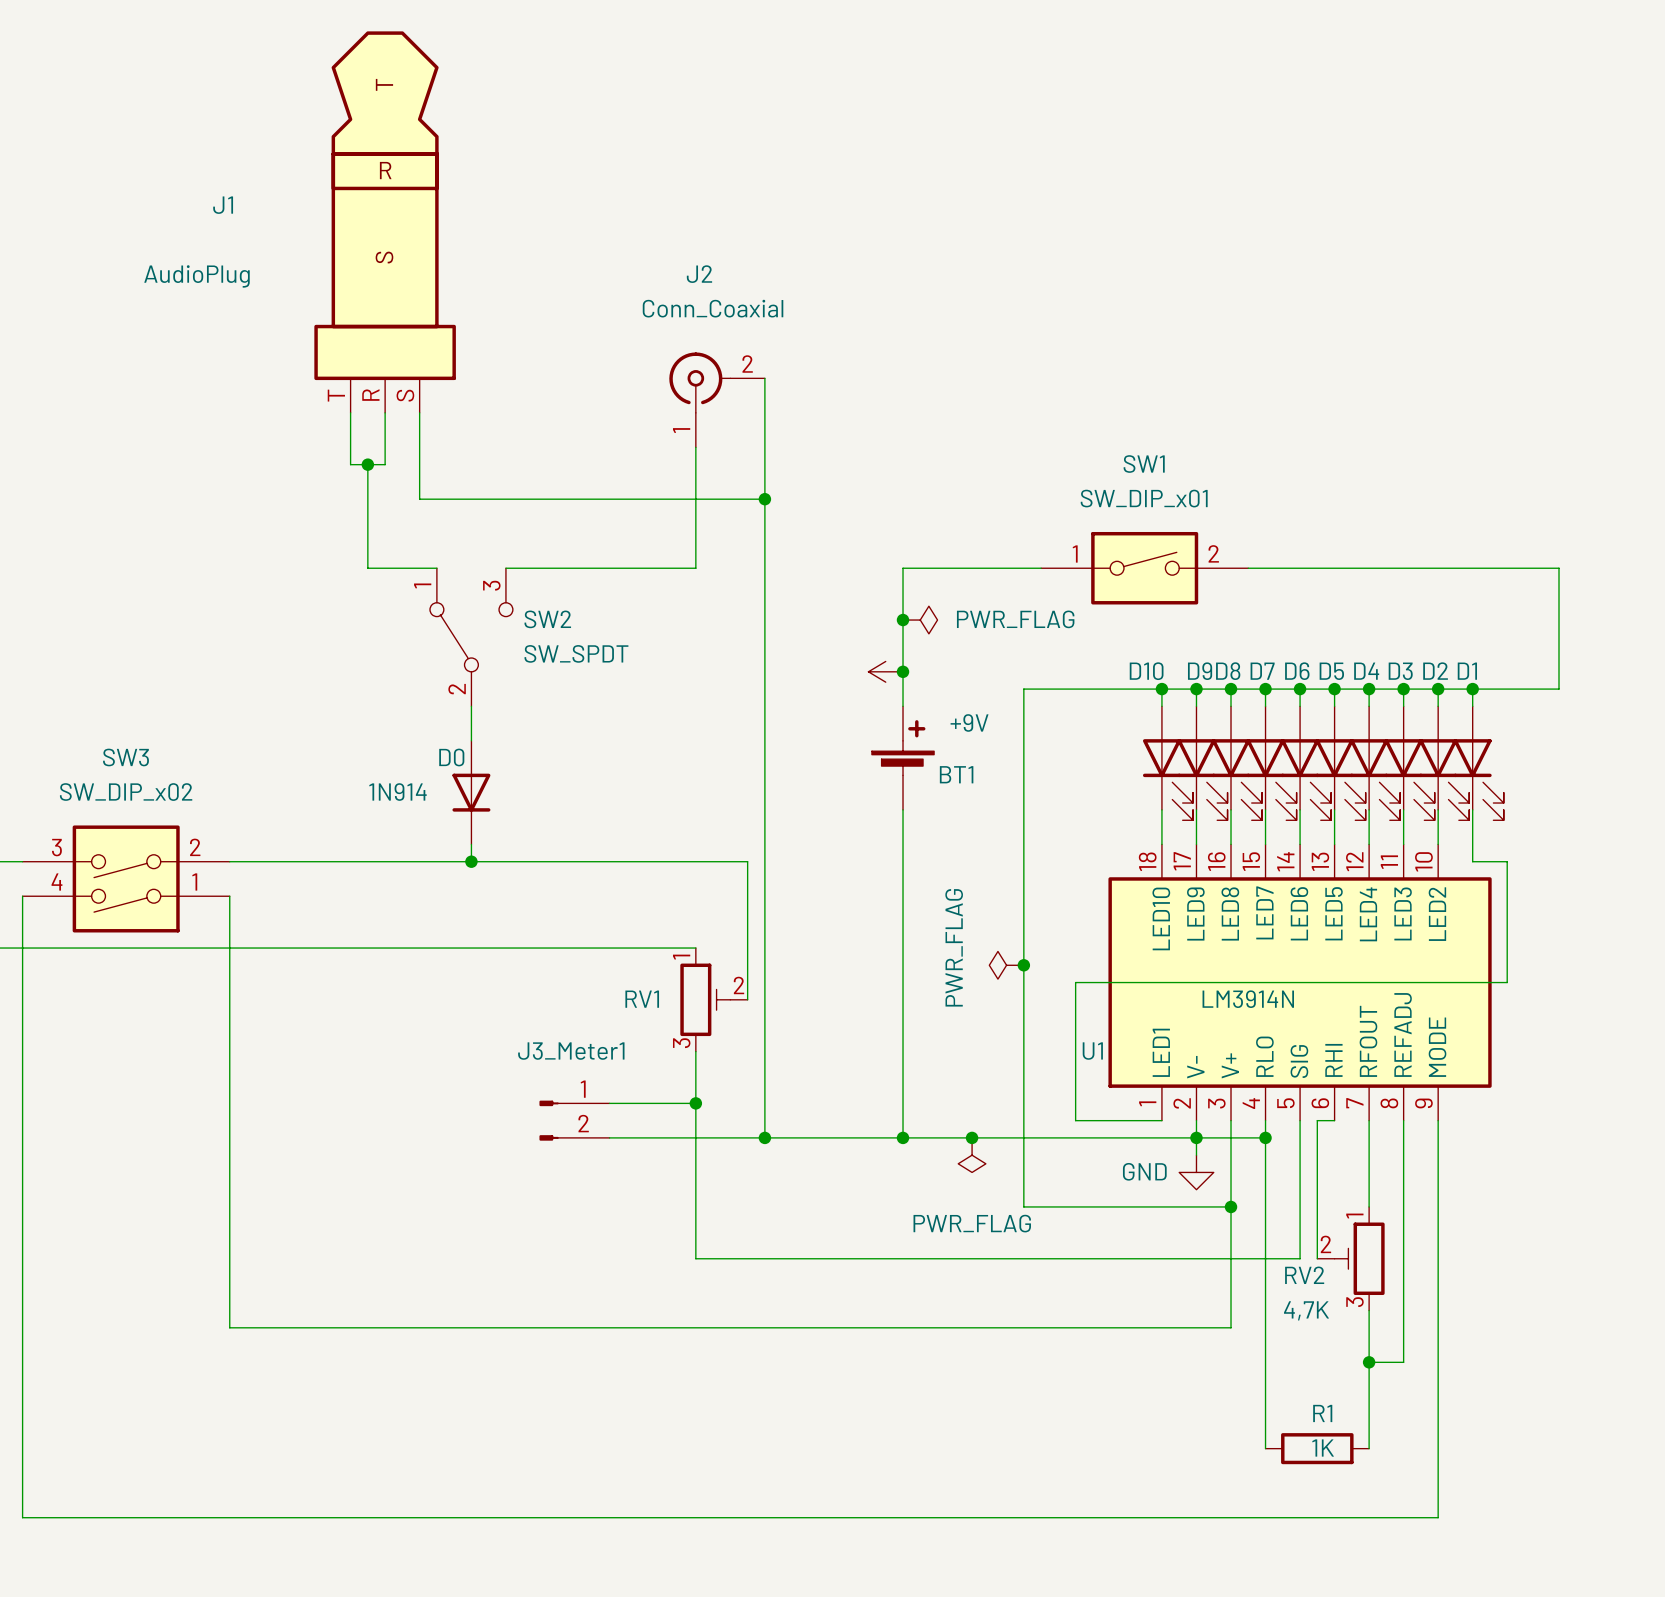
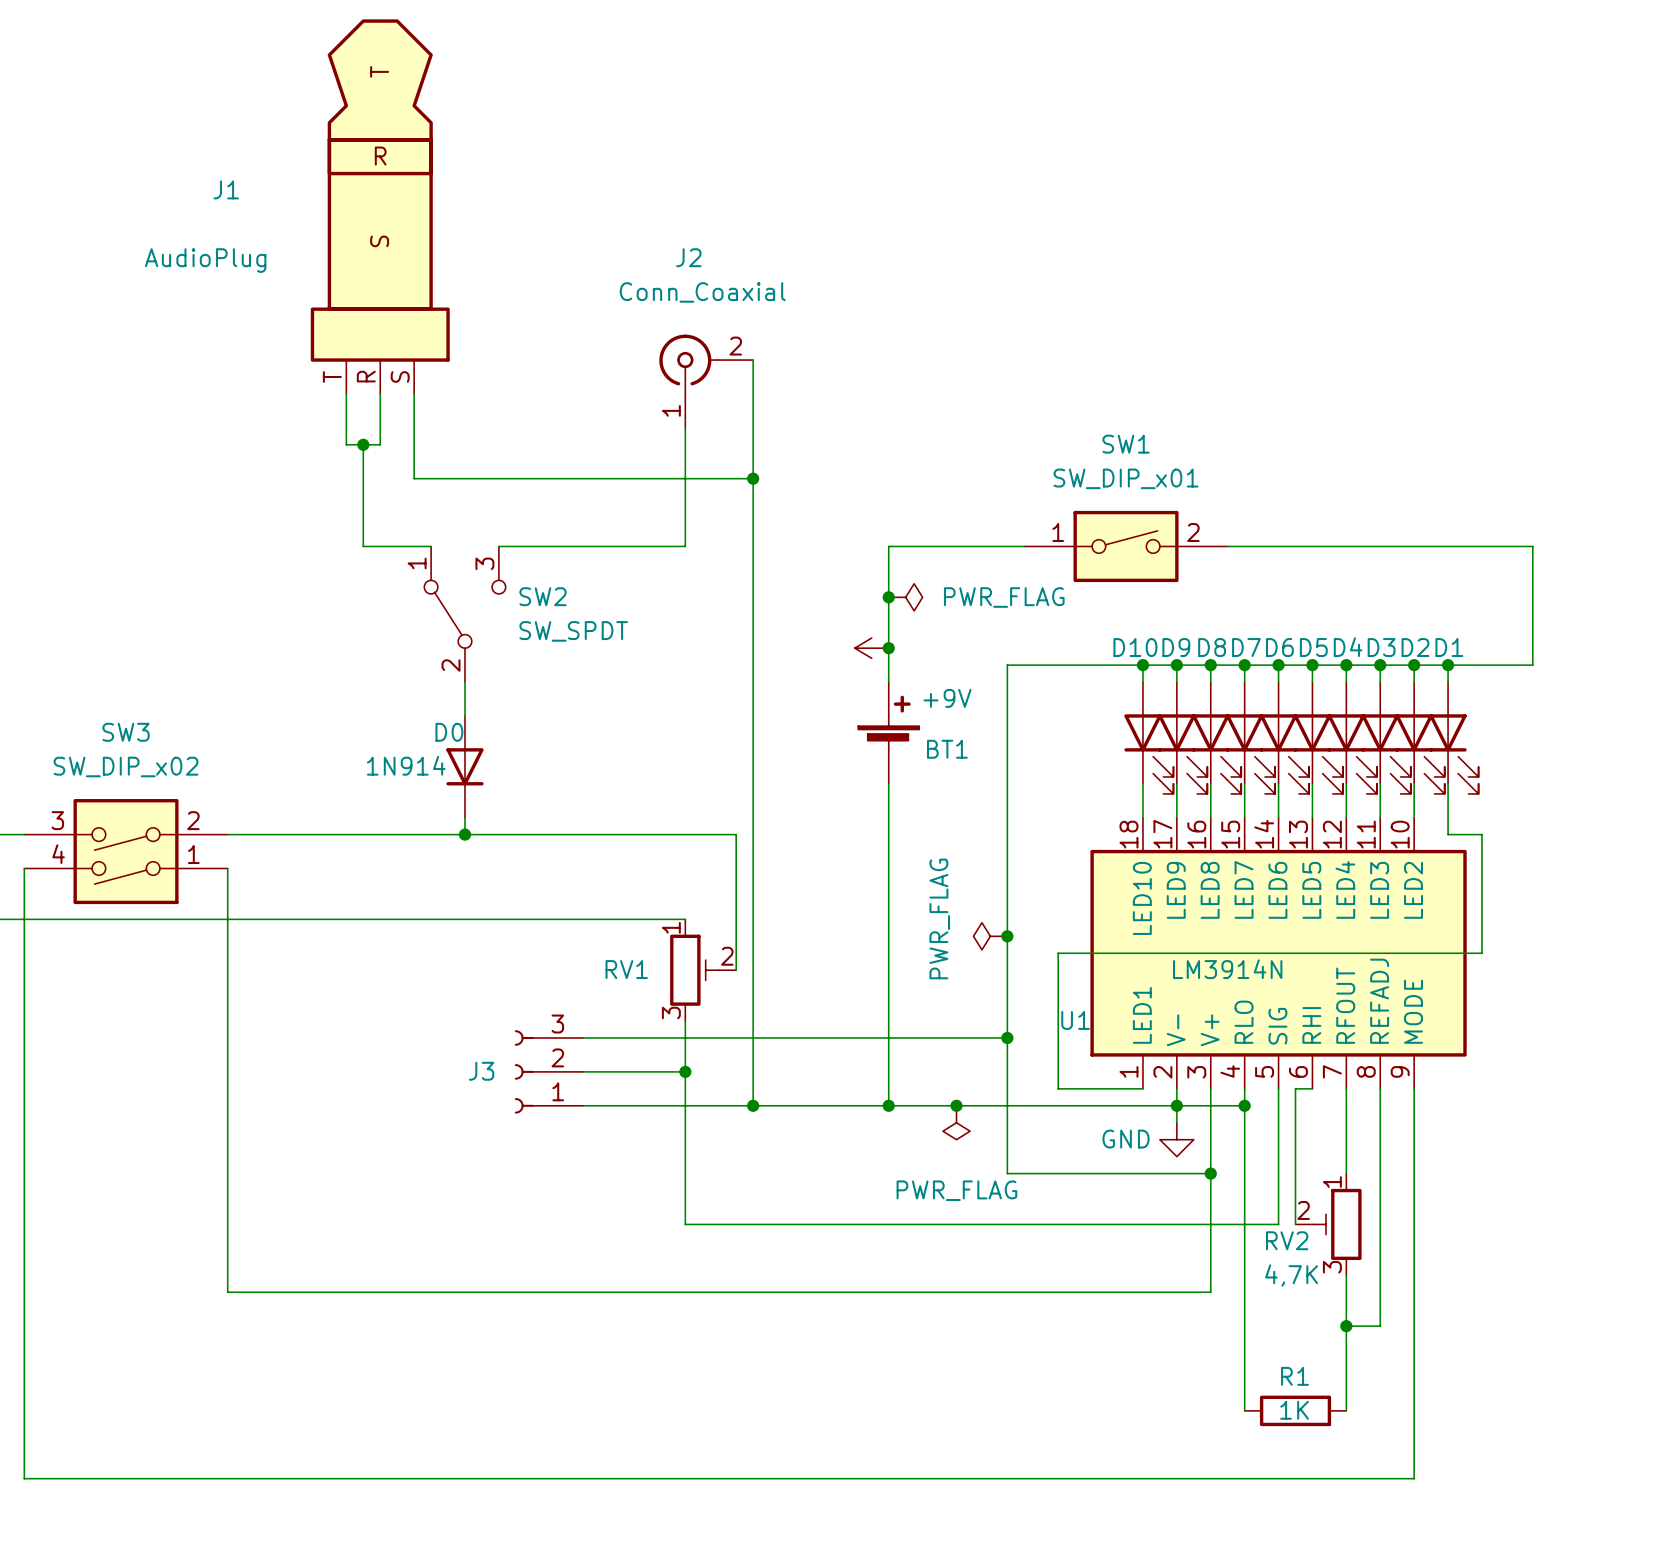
wire: none -> (583, 1038) (1007, 1038)
junction: none -> (1007, 1038)
J3: none -> (549, 1071)
J3_Meter1: (574, 1120) -> none

